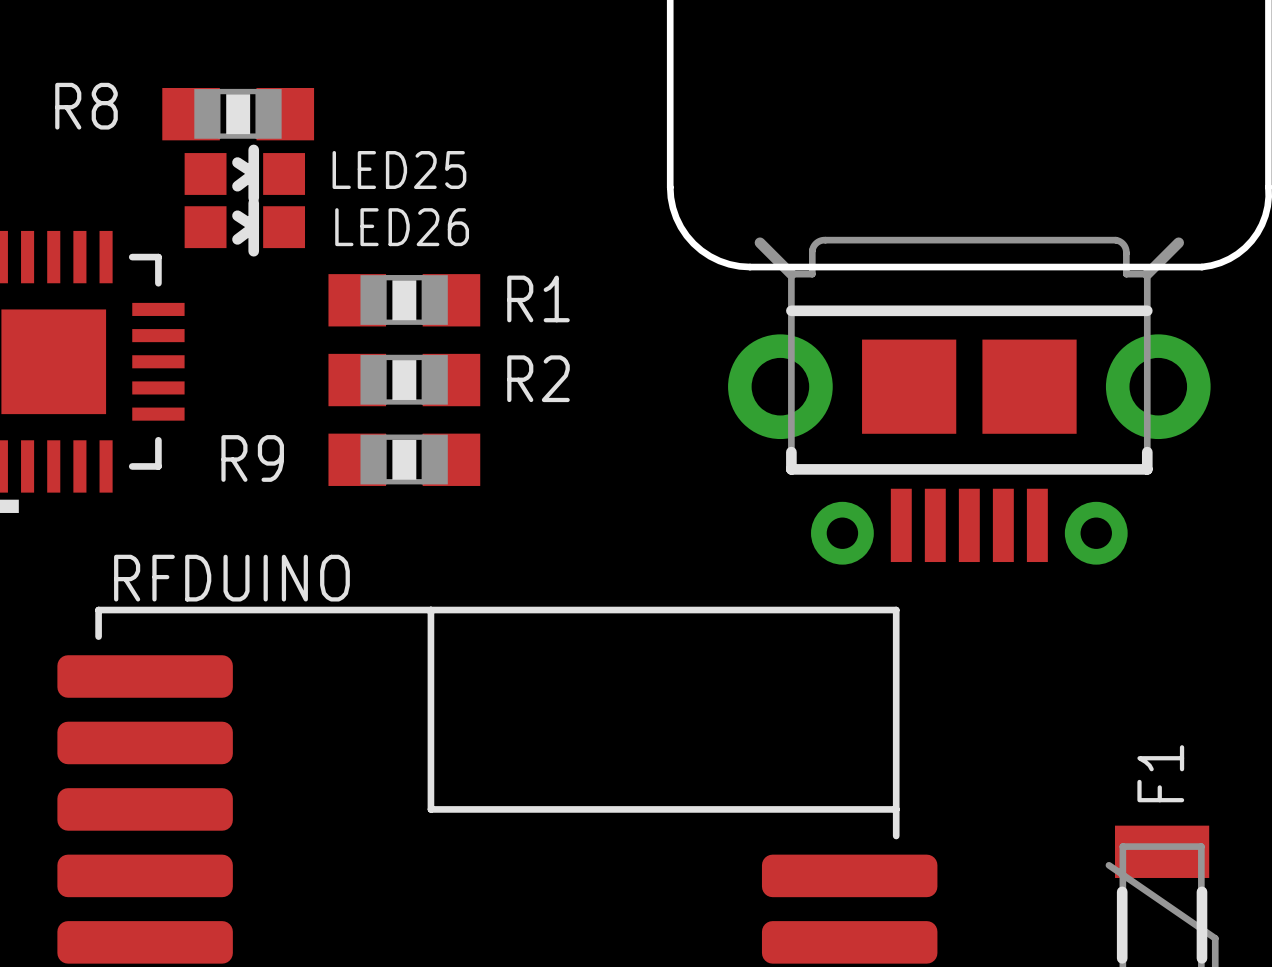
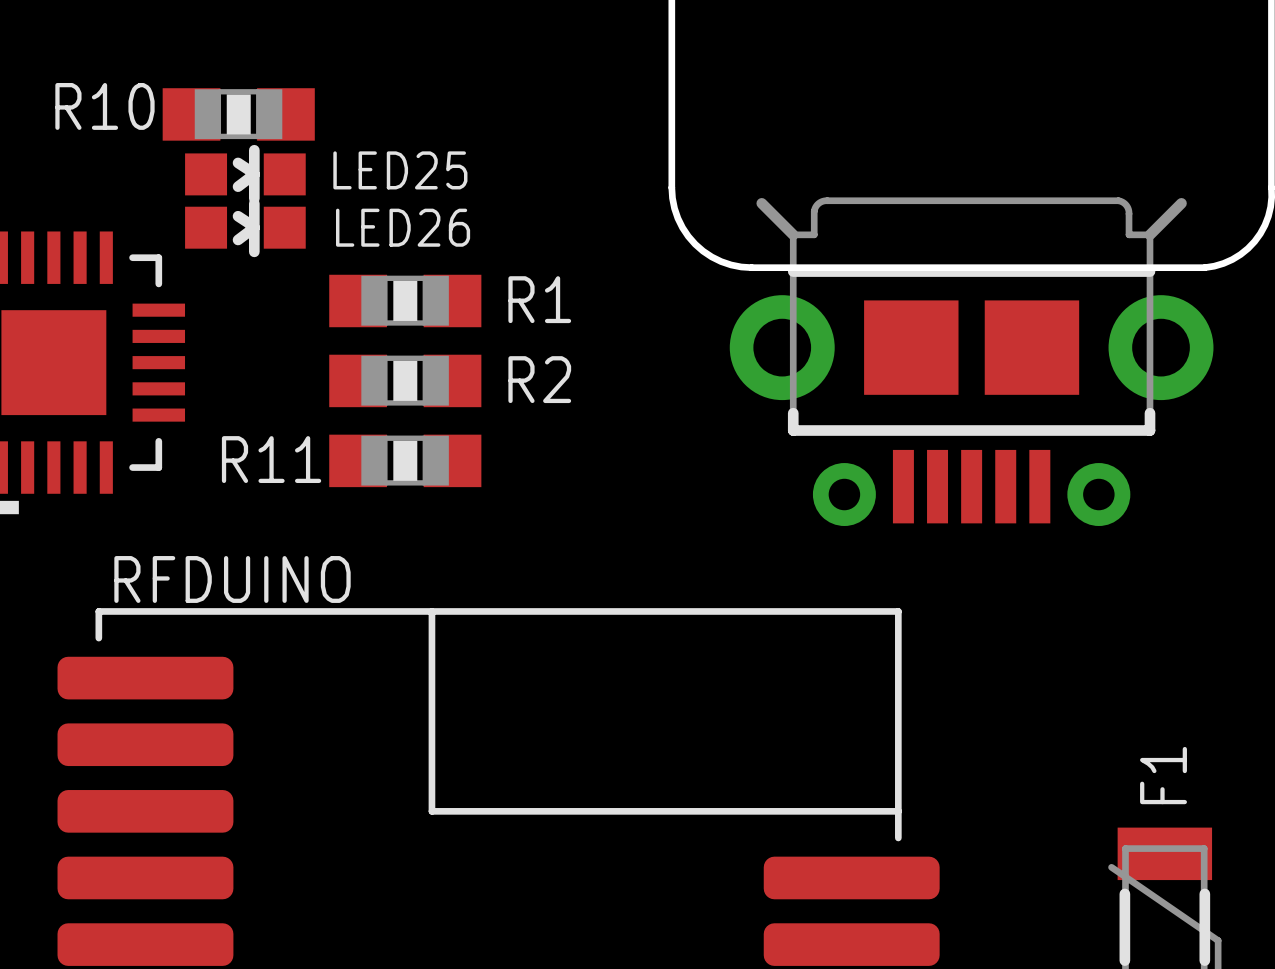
R8 name: R8 (86, 106) -> R10 (104, 106)
part position: (969, 400) -> (971, 361)
R9 name: R9 (252, 458) -> R11 (271, 459)

